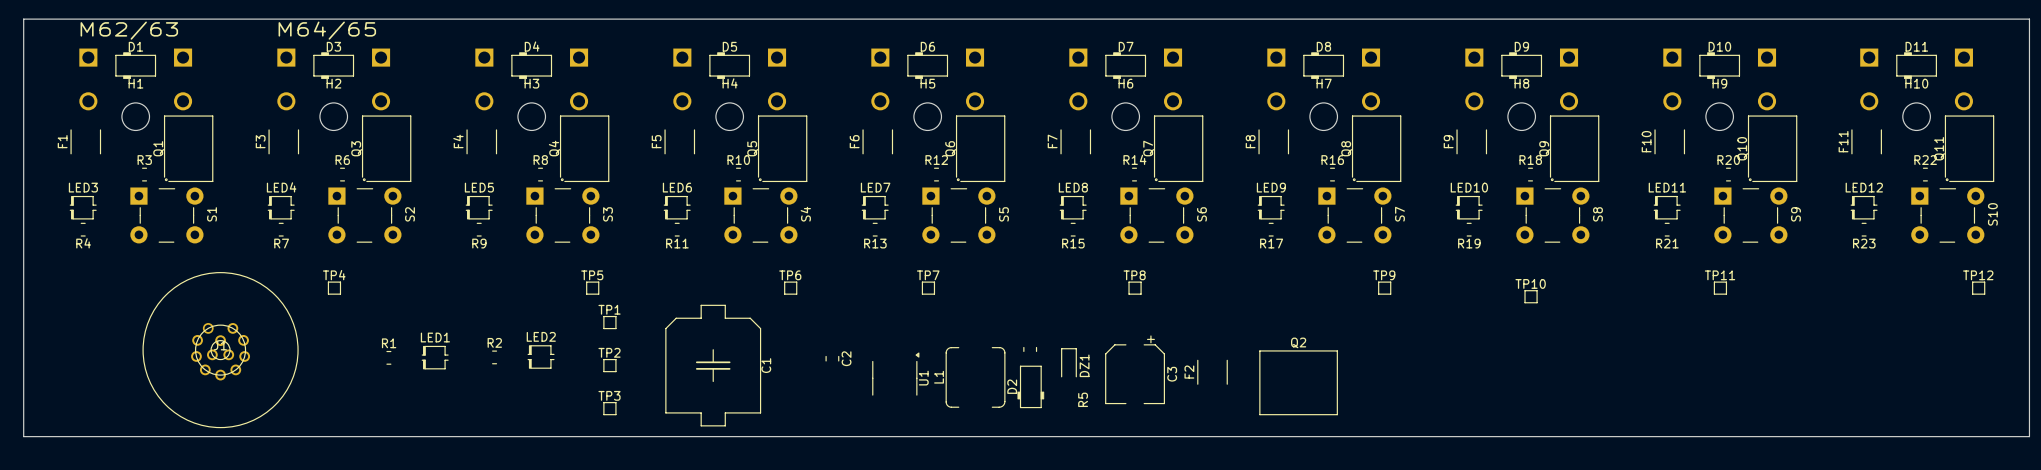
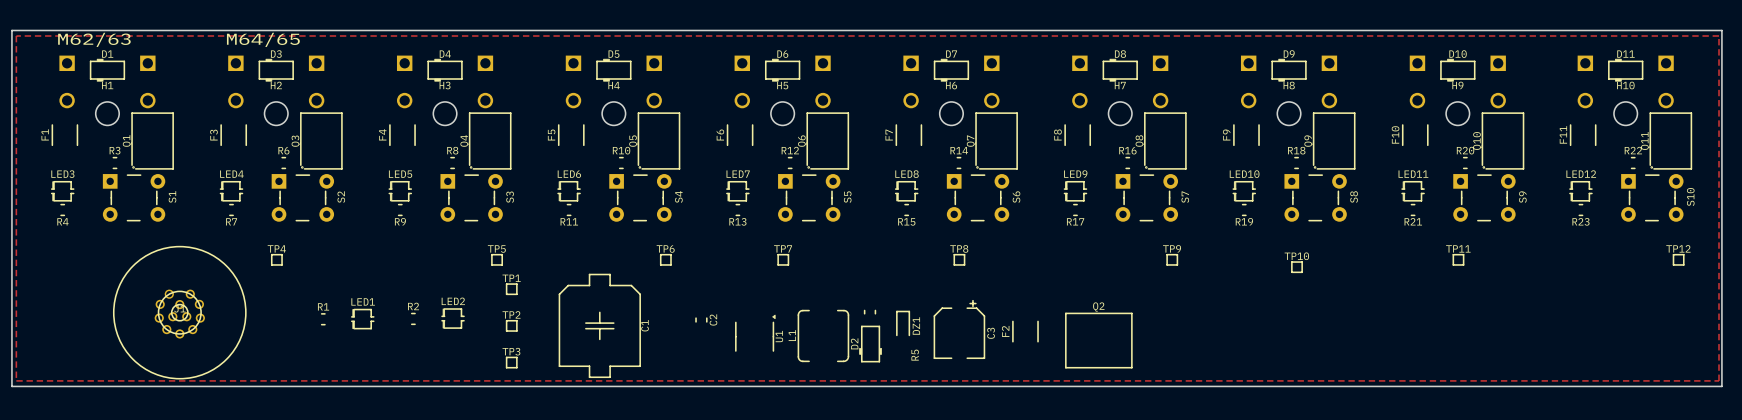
zone outline: none -> (16, 35) (16, 380) (1719, 380) (1719, 35) (16, 35)

